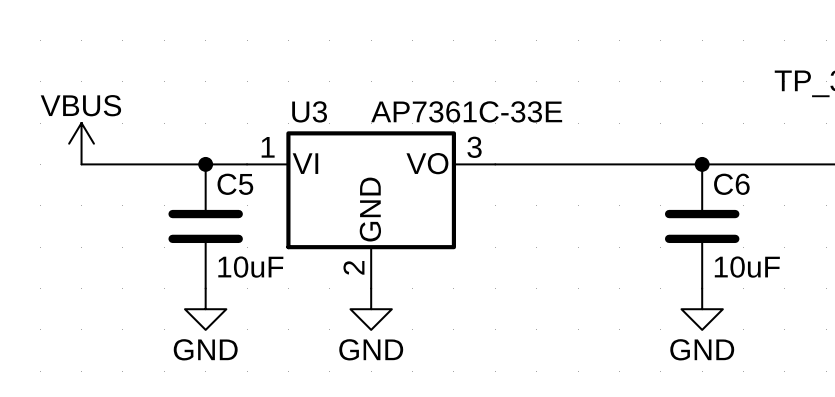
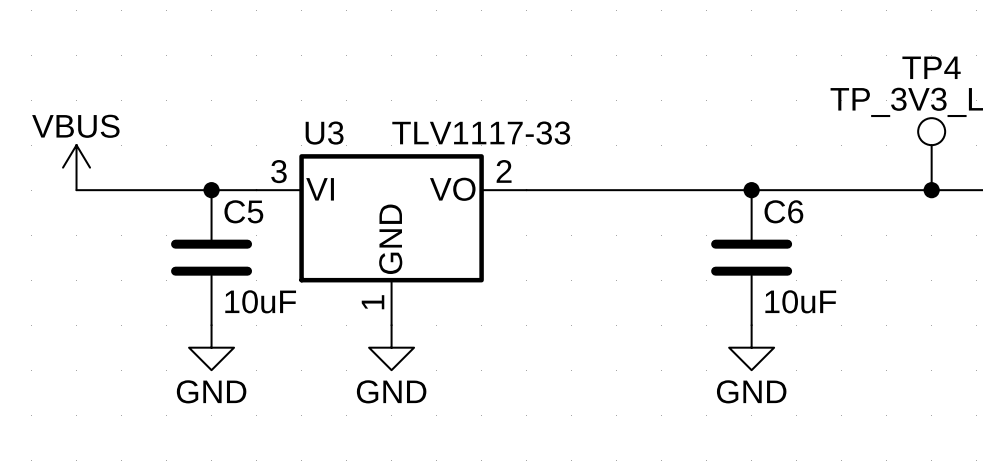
U3 value: AP7361C-33E (466, 111) -> TLV1117-33 (481, 133)
U3 pin number: 1 (268, 147) -> 3 (278, 171)
U3 pin number: 3 (474, 147) -> 2 (504, 171)
U3 pin number: 2 (353, 267) -> 1 (373, 302)

